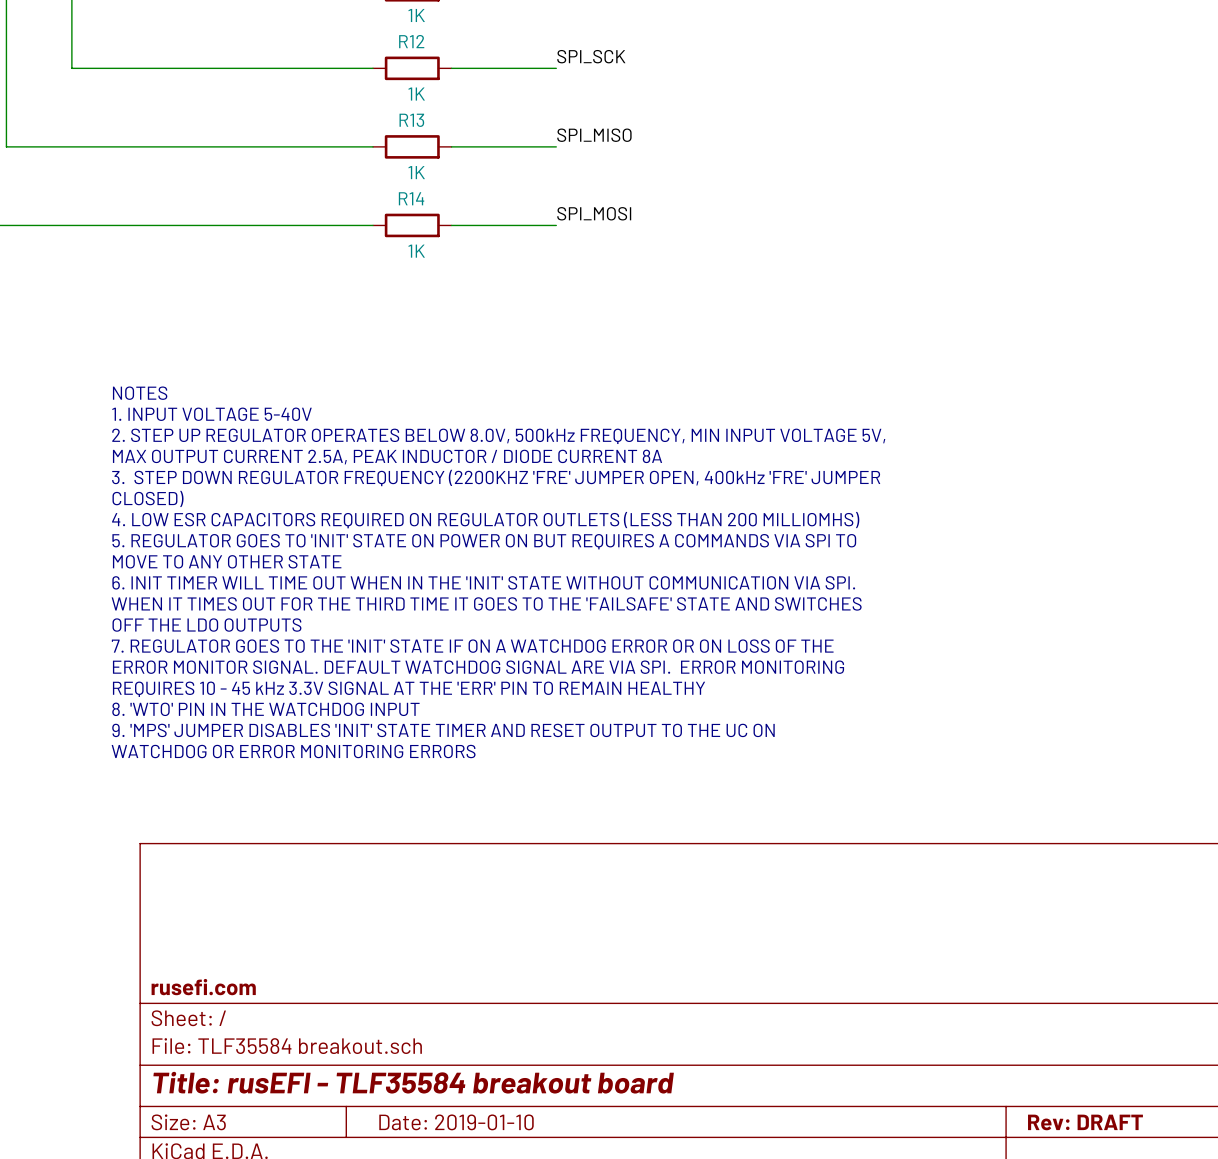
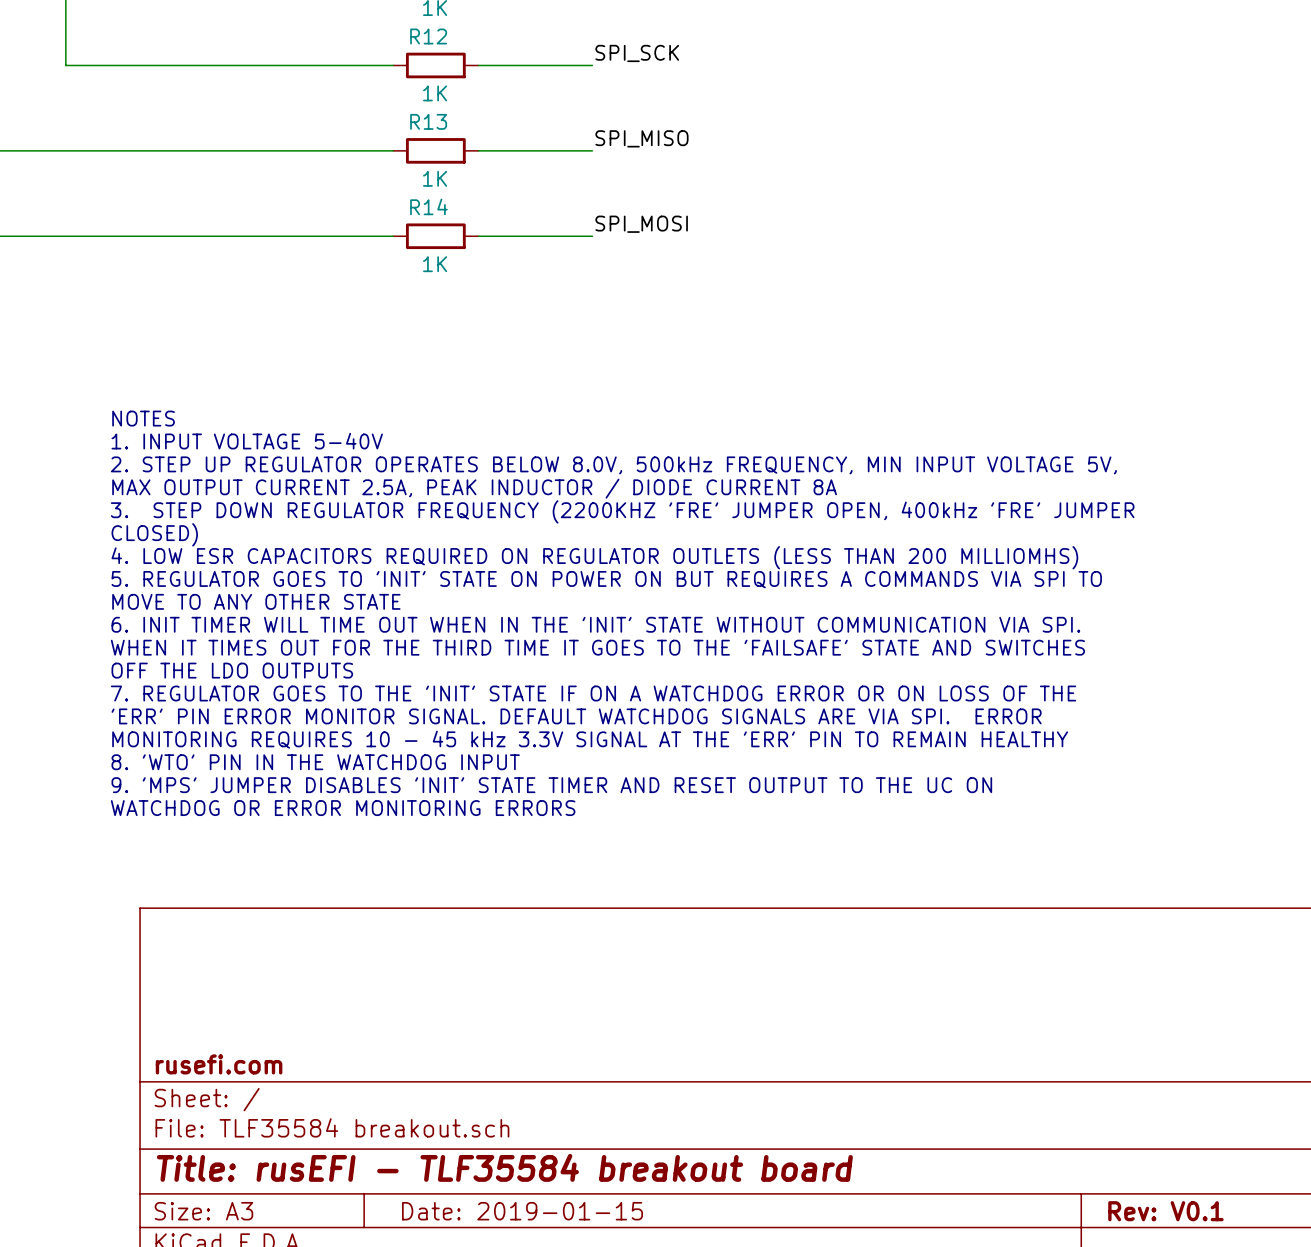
text: ERROR MONITOR SIGNAL. DEFAULT WATCHDOG SIGNAL ARE VIA SPI. ERROR MONITORING (478, 667) -> 'ERR' PIN ERROR MONITOR SIGNAL. DEFAULT WATCHDOG SIGNALS ARE VIA SPI. ERROR (576, 716)
text: REQUIRES 10 - 45 kHz 3.3V SIGNAL AT THE 'ERR' PIN TO REMAIN HEALTHY (409, 689) -> MONITORING REQUIRES 10 - 45 kHz 3.3V SIGNAL AT THE 'ERR' PIN TO REMAIN HEALTHY (590, 739)
title block: Date: 2019-01-10 (456, 1122) -> Date: 2019-01-15 (522, 1211)
title block: Rev: DRAFT (1085, 1122) -> Rev: V0.1 (1165, 1211)

